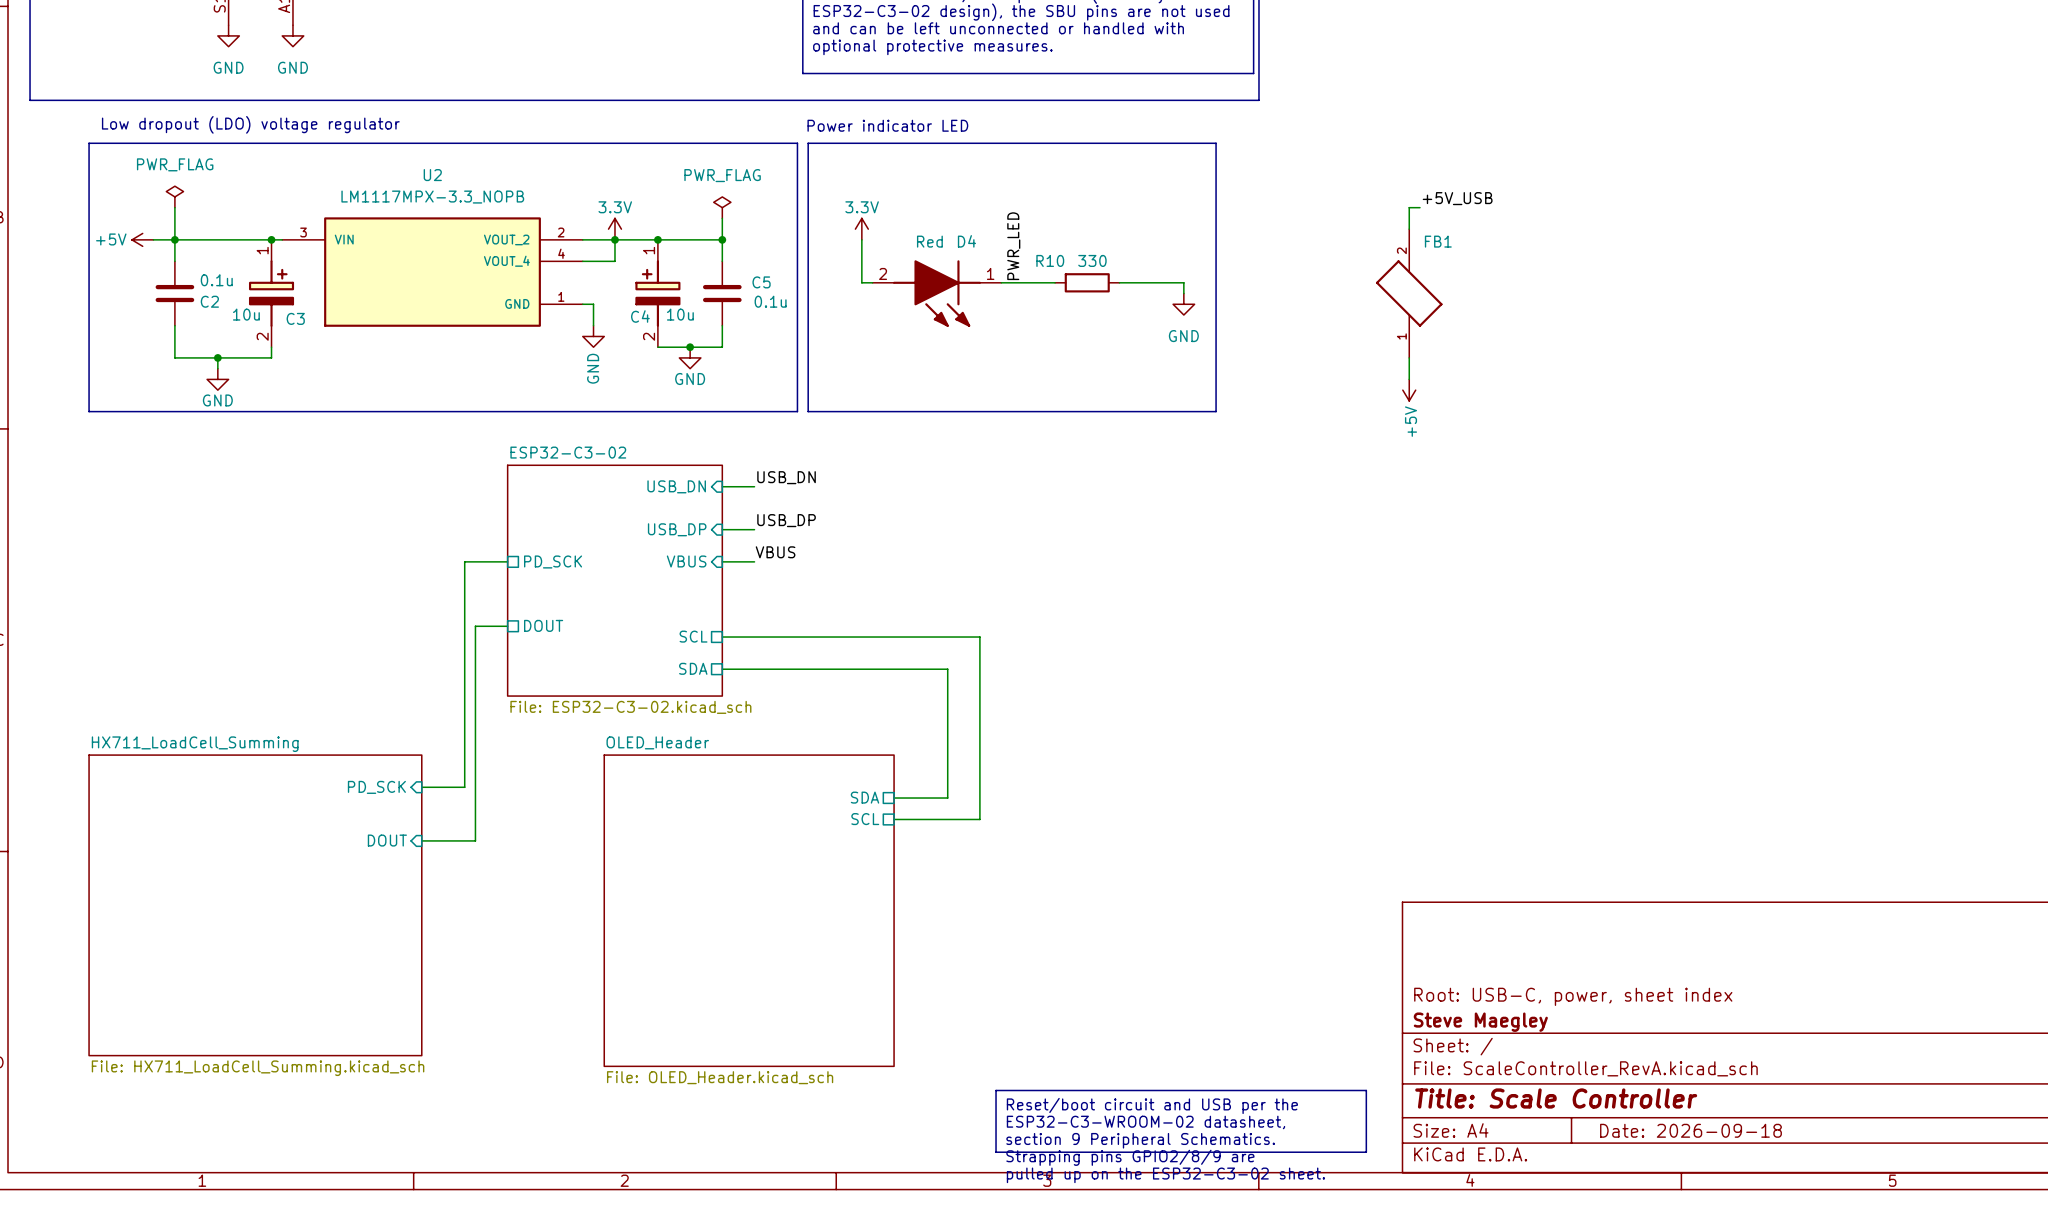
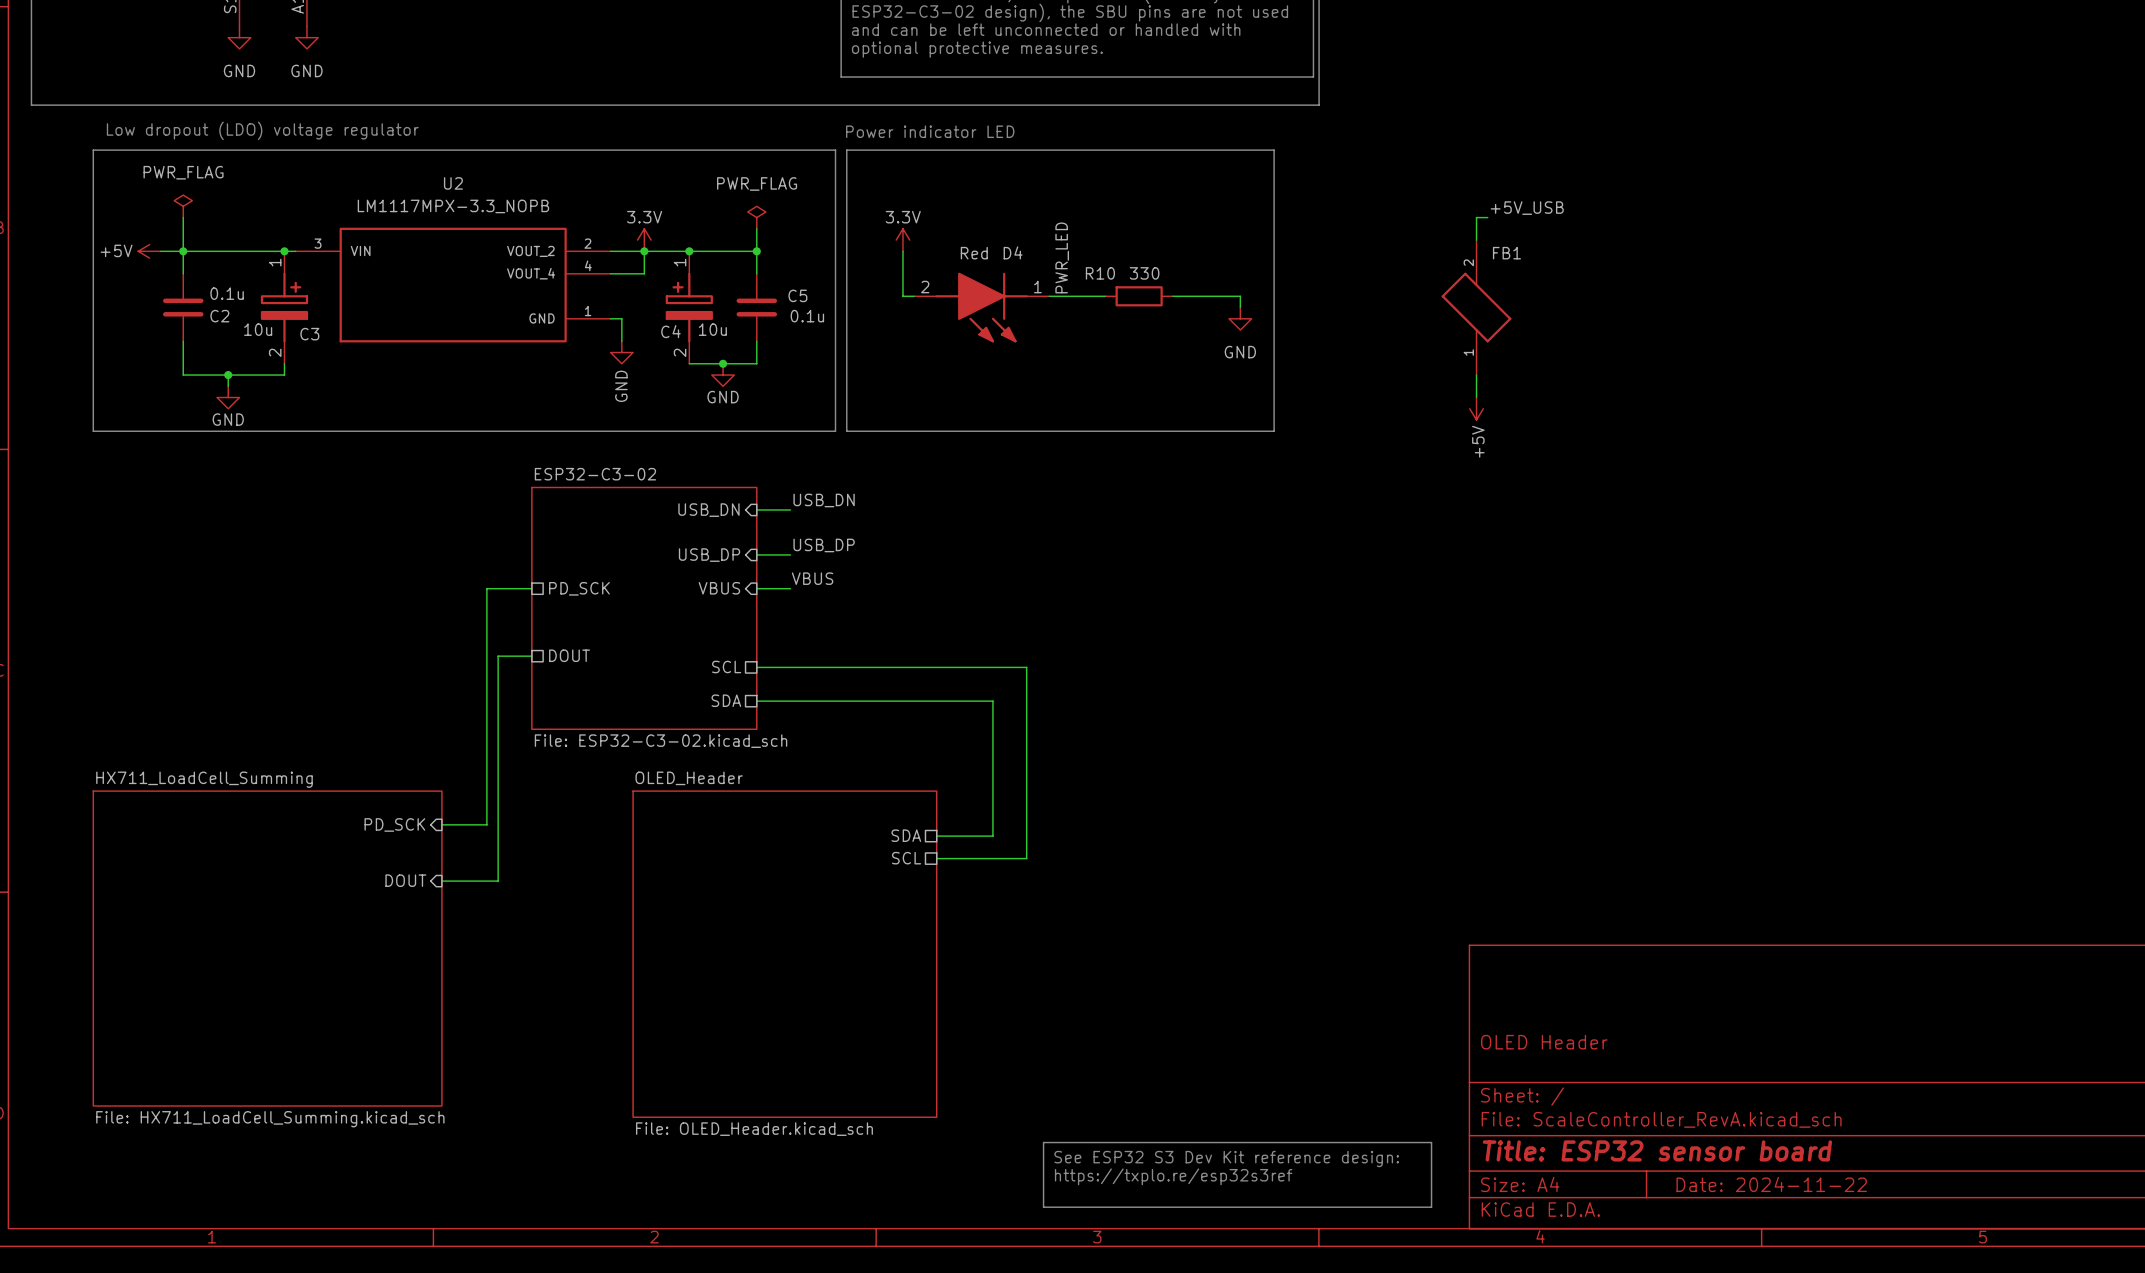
title block: Root: USB-C, power, sheet index (1573, 996) -> OLED Header (1544, 1042)
title block: Steve Maegley (1480, 1022) -> none
title block: Title: Scale Controller (1556, 1098) -> Title: ESP32 sensor board (1657, 1150)
text: Reset/boot circuit and USB per the (1152, 1105) -> See ESP32 S3 Dev Kit reference design: (1226, 1159)
text: ESP32-C3-WROOM-02 datasheet, (1145, 1122) -> https://txplo.re/esp32s3ref (1173, 1176)
title block: Date: 2026-09-18 (1690, 1130) -> Date: 2024-11-22 (1771, 1184)
text: section 9 Peripheral Schematics. (1140, 1140) -> none
text: Strapping pins GPIO2/8/9 are (1130, 1157) -> none
text: pulled up on the ESP32-C3-02 sheet. (1165, 1175) -> none

